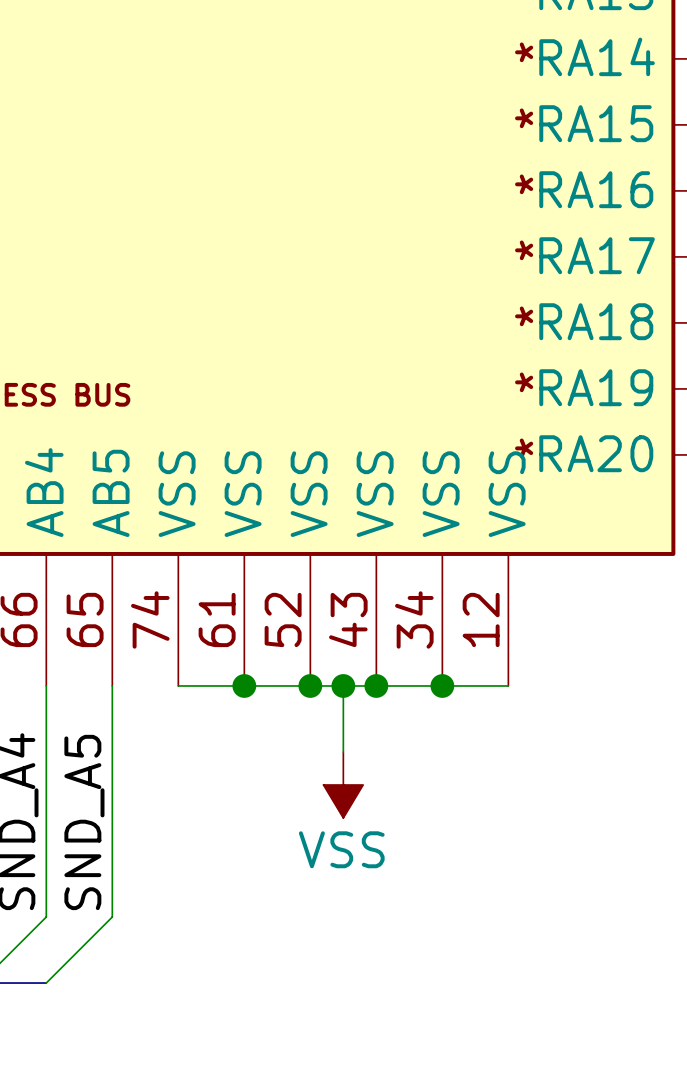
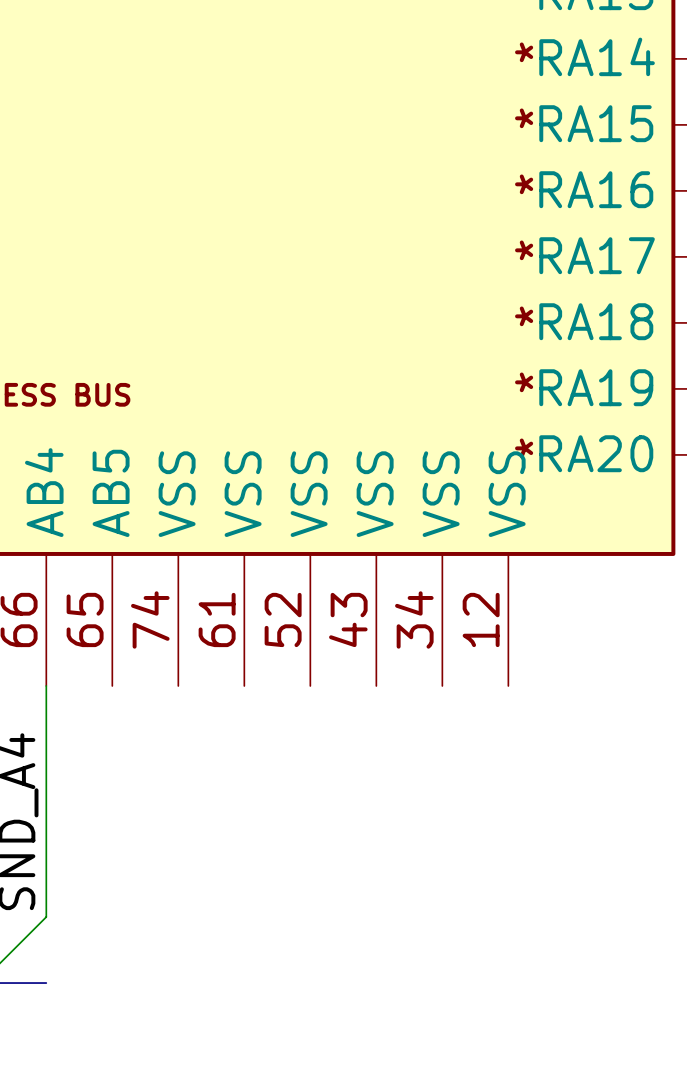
wire: (112, 685) (112, 917) (46, 983) -> none
wire: (178, 685) (508, 685) -> none
junction: (244, 685) -> none
junction: (310, 685) -> none
wire: (343, 685) (343, 751) -> none
junction: (343, 685) -> none
junction: (376, 685) -> none
junction: (442, 685) -> none
power symbol: VSS (343, 785) -> none
label: SND_A5 (84, 822) -> none

